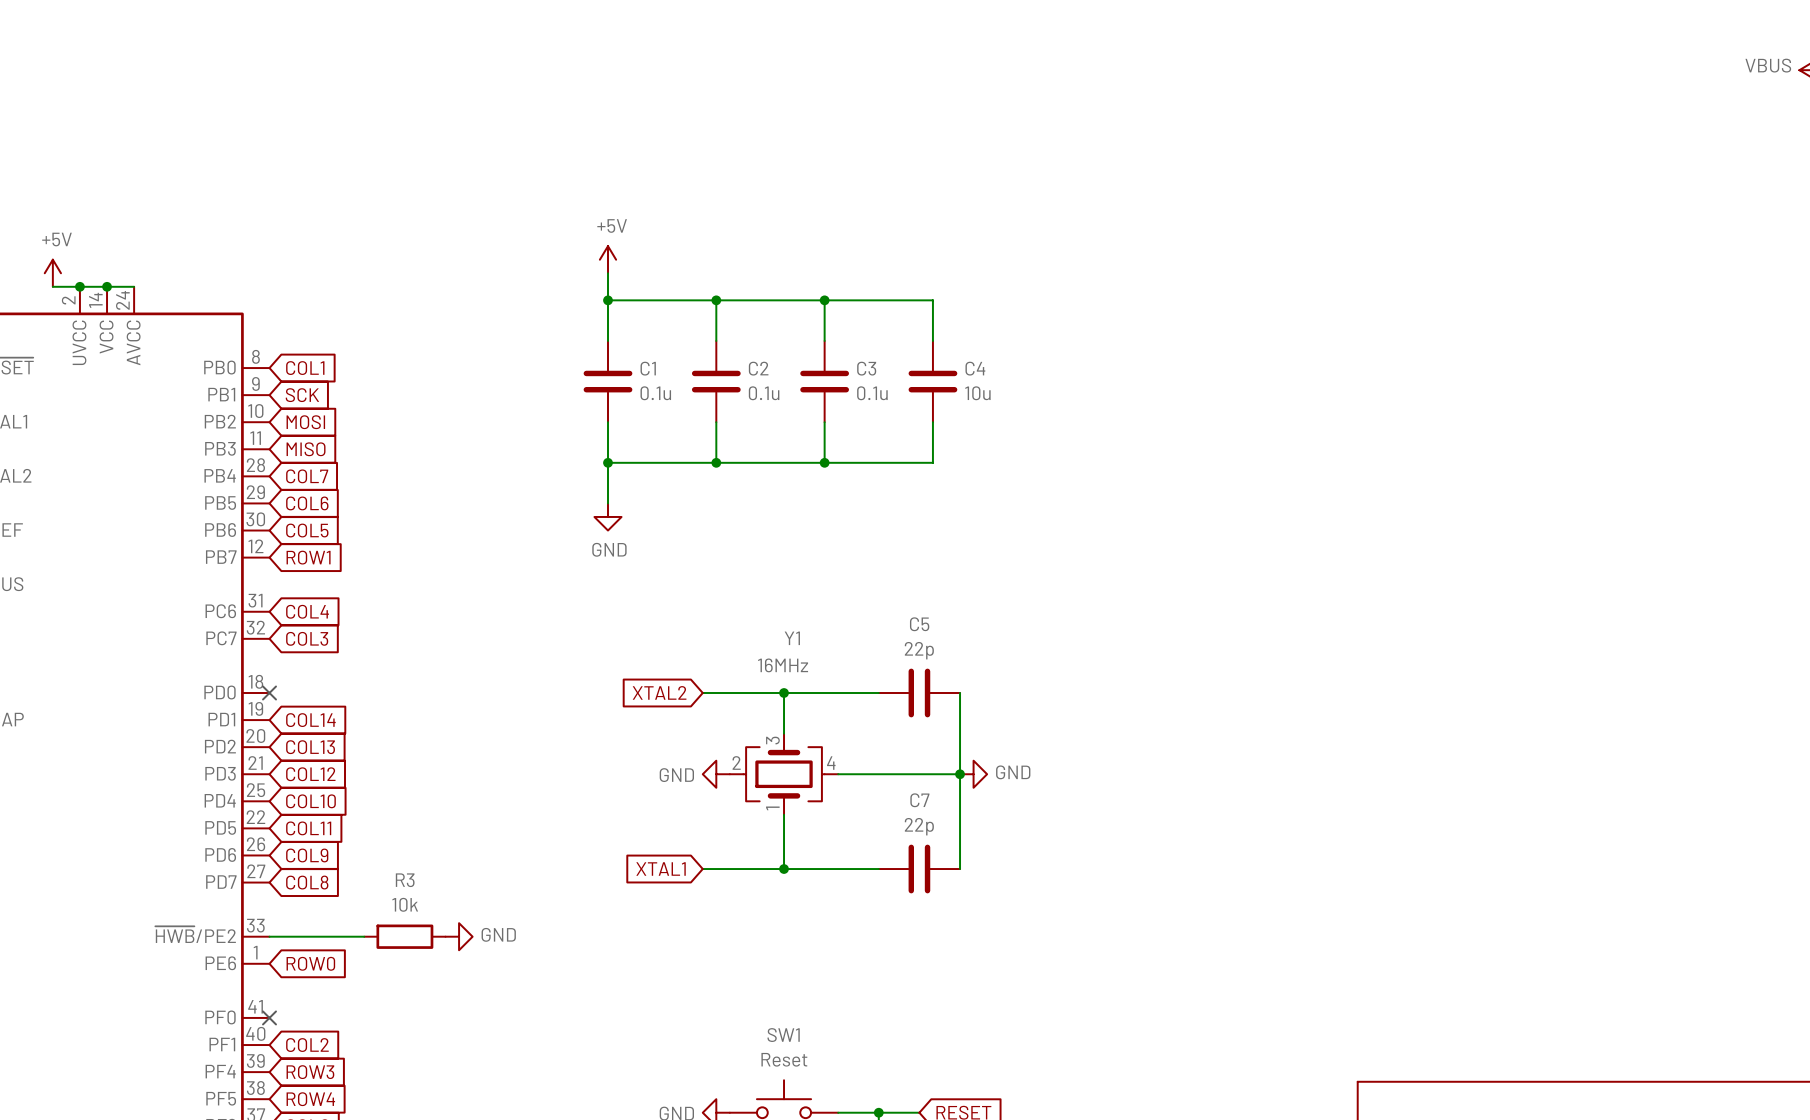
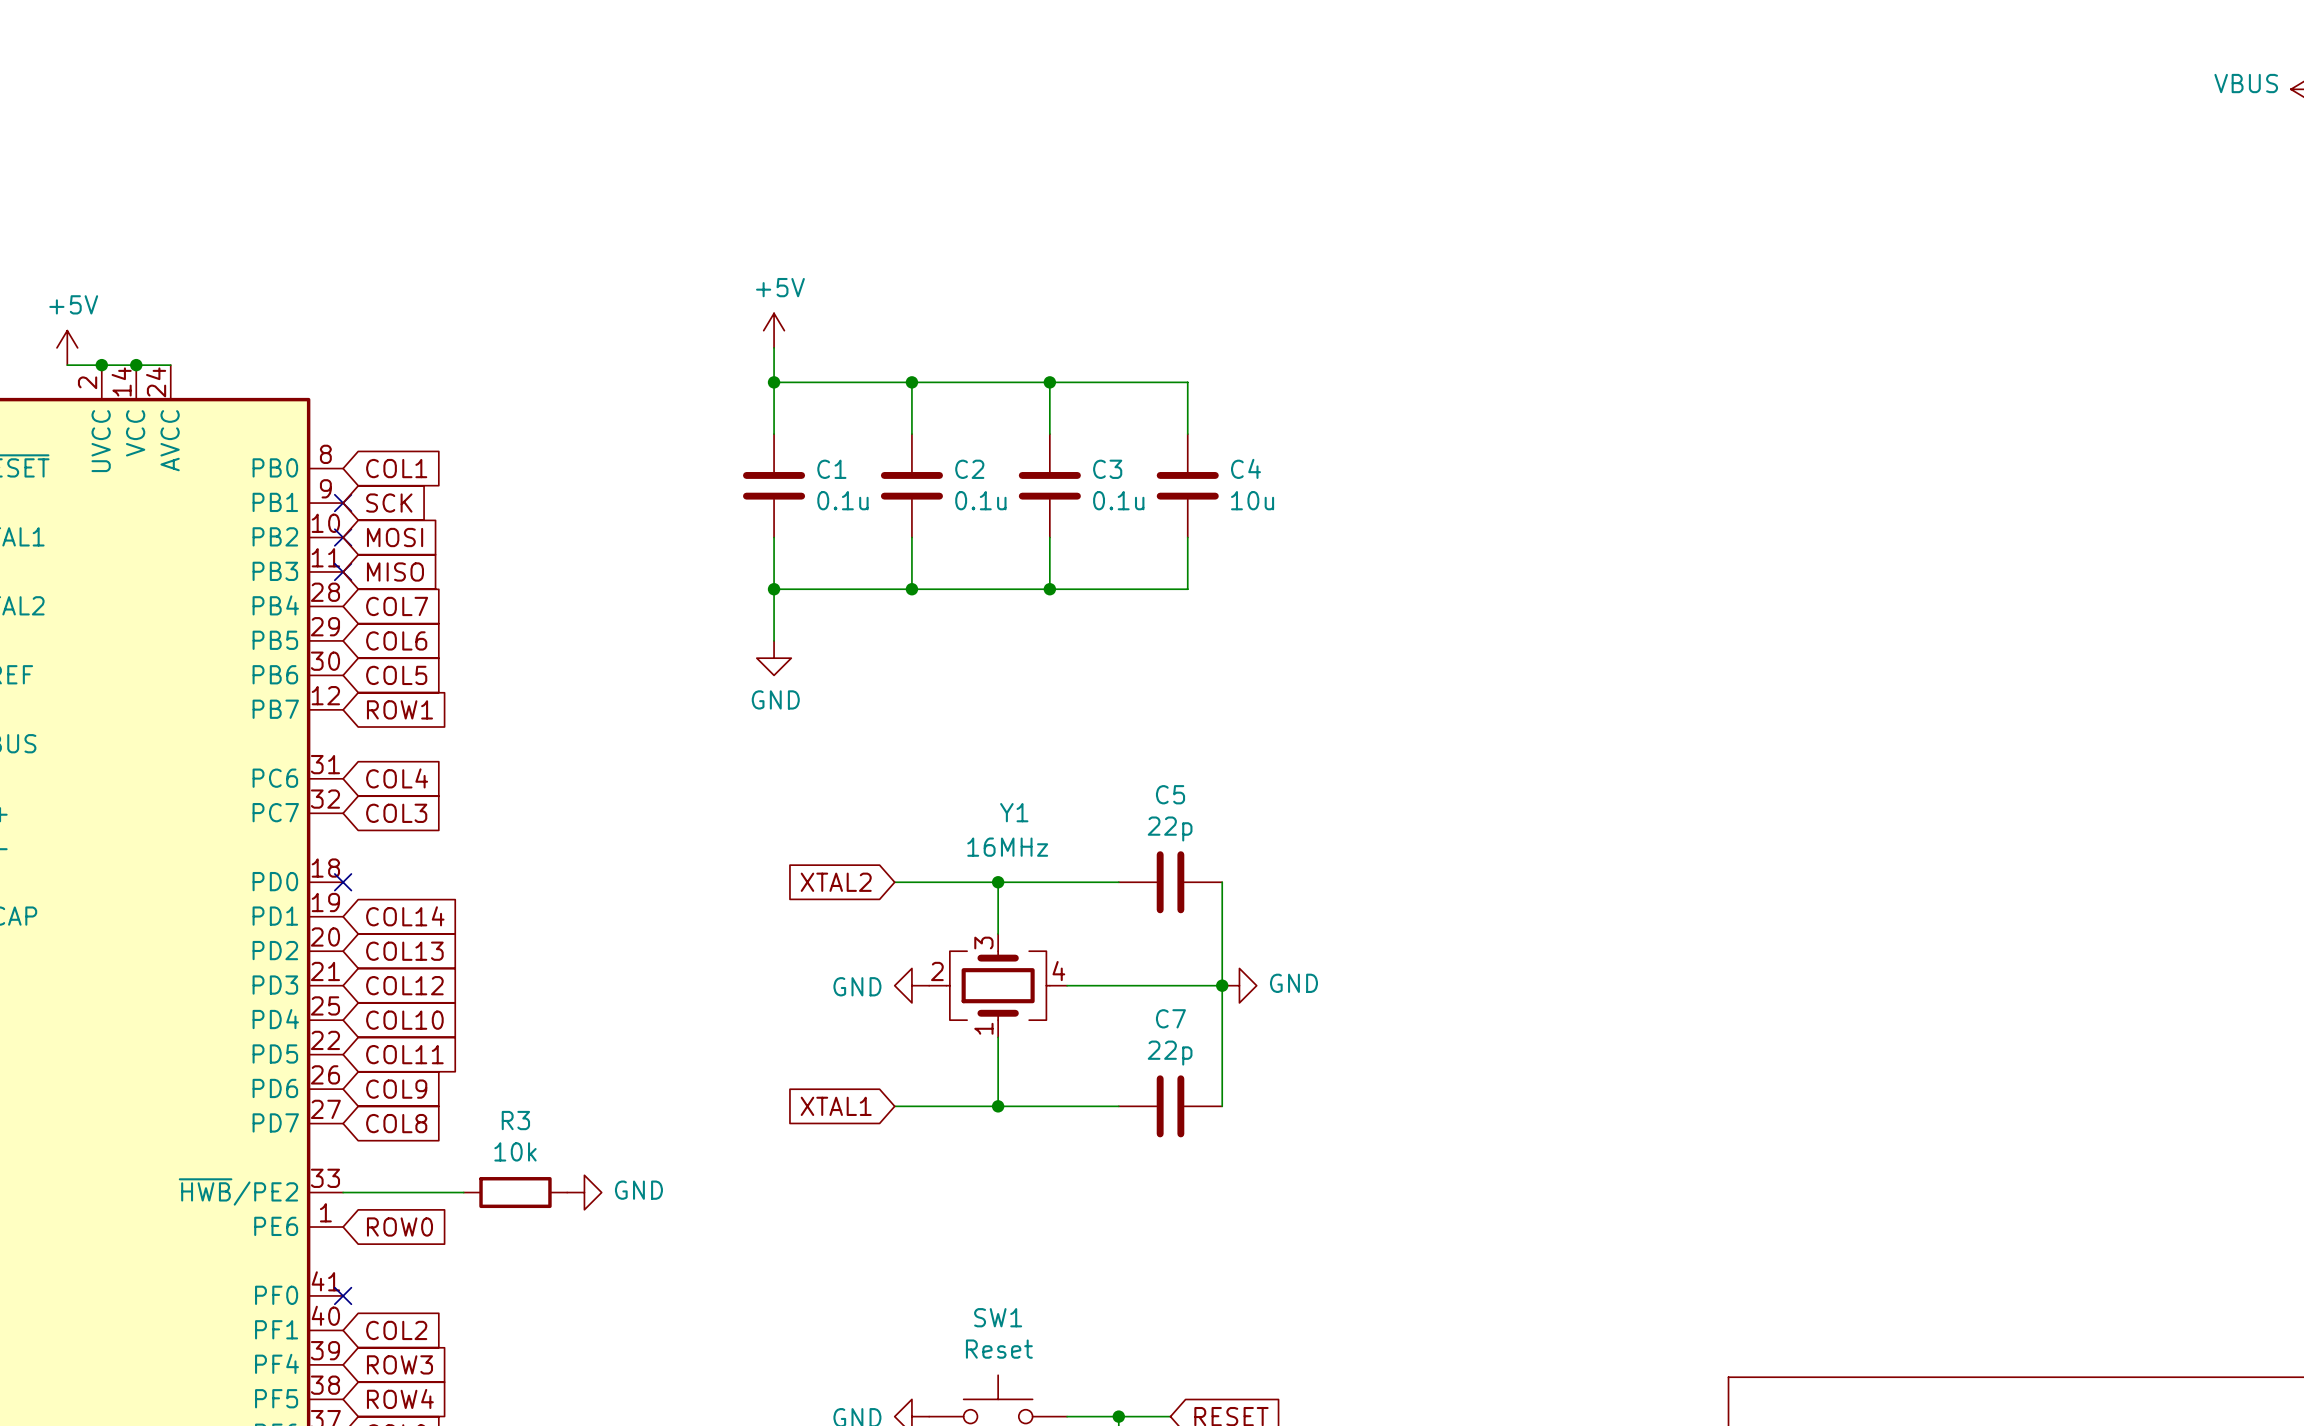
no-connect mark: none -> (343, 503)
no-connect mark: none -> (343, 537)
no-connect mark: none -> (343, 571)

